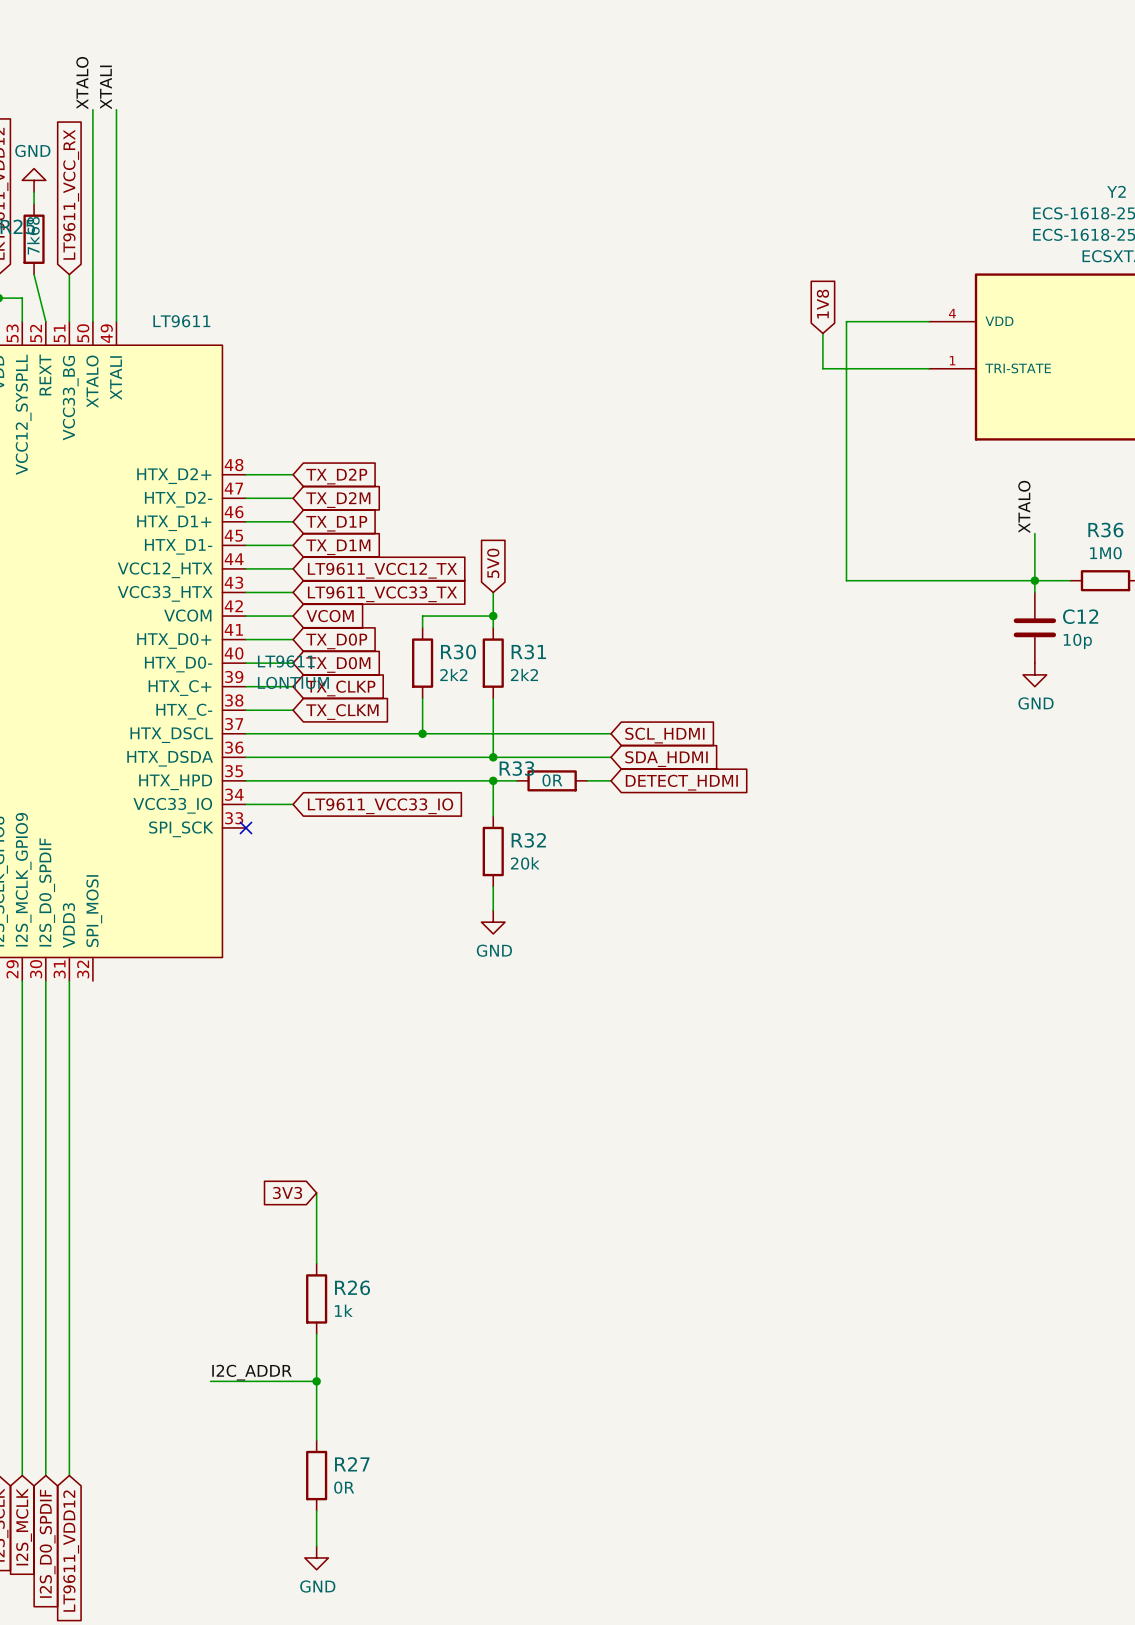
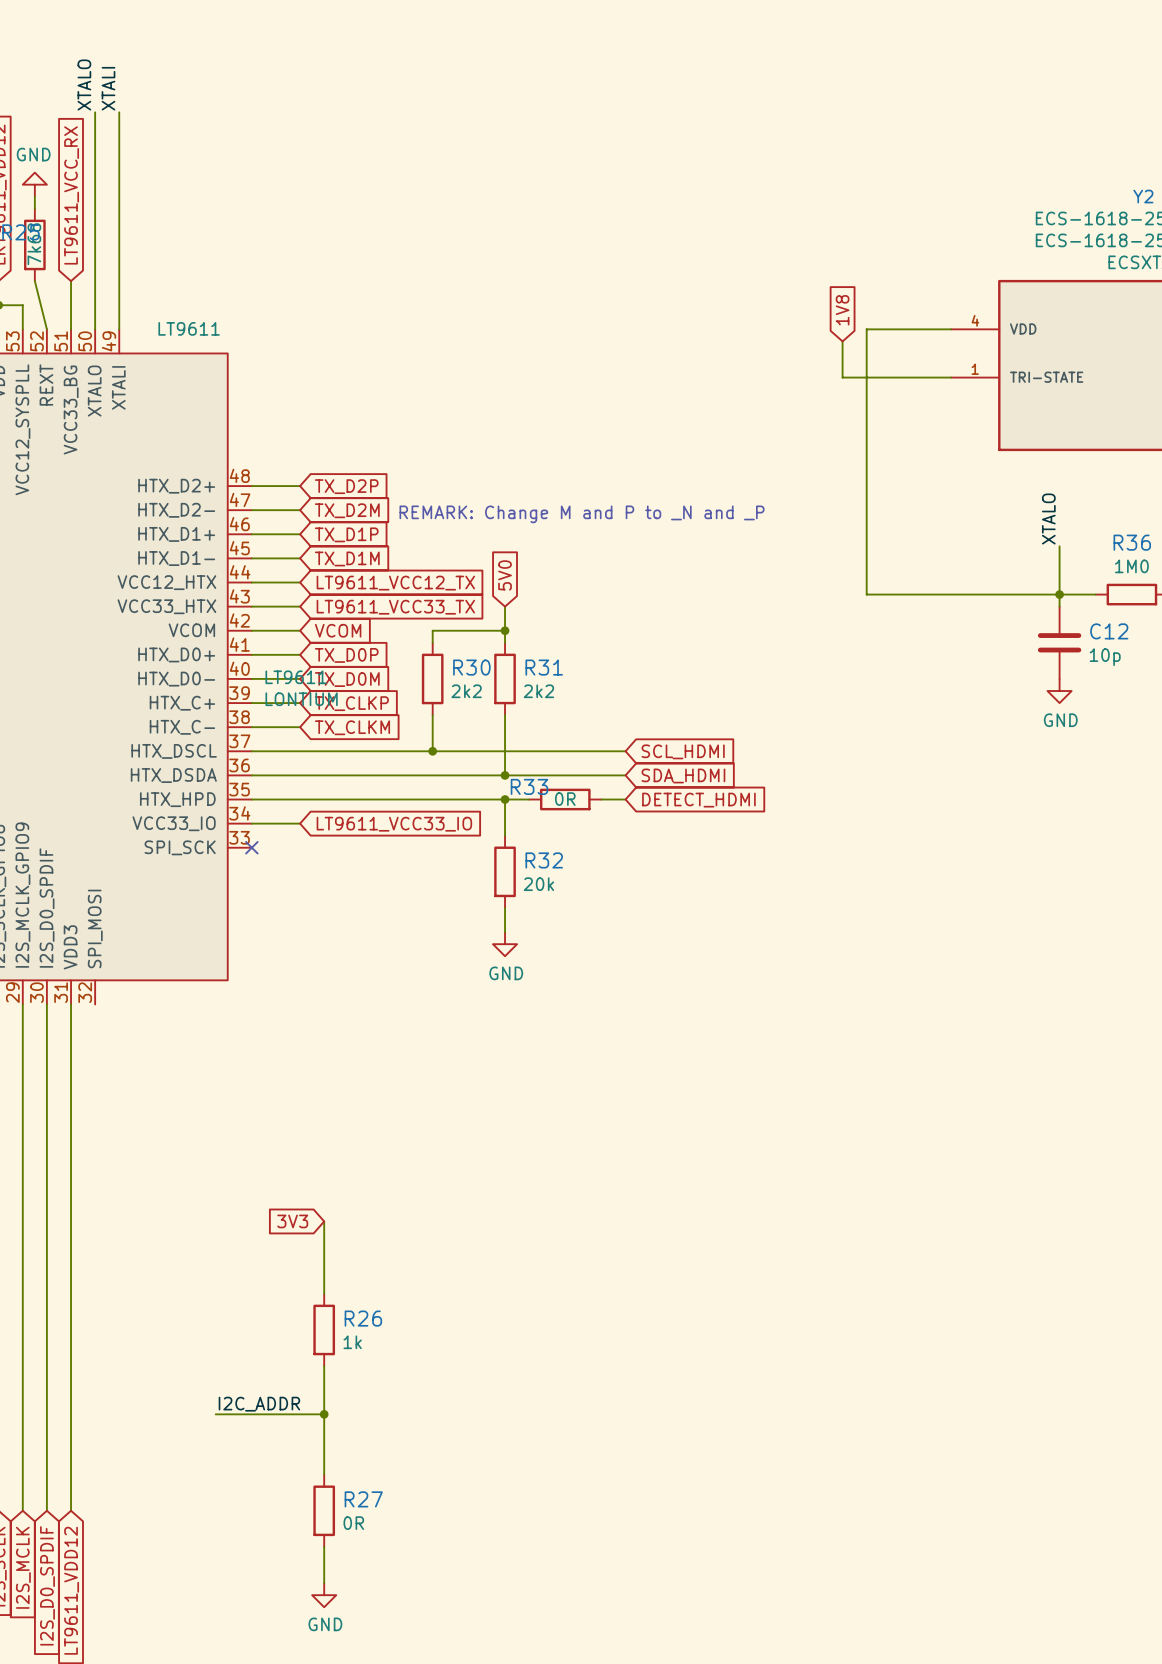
text: none -> REMARK: Change M and P to _N and _P (582, 514)

